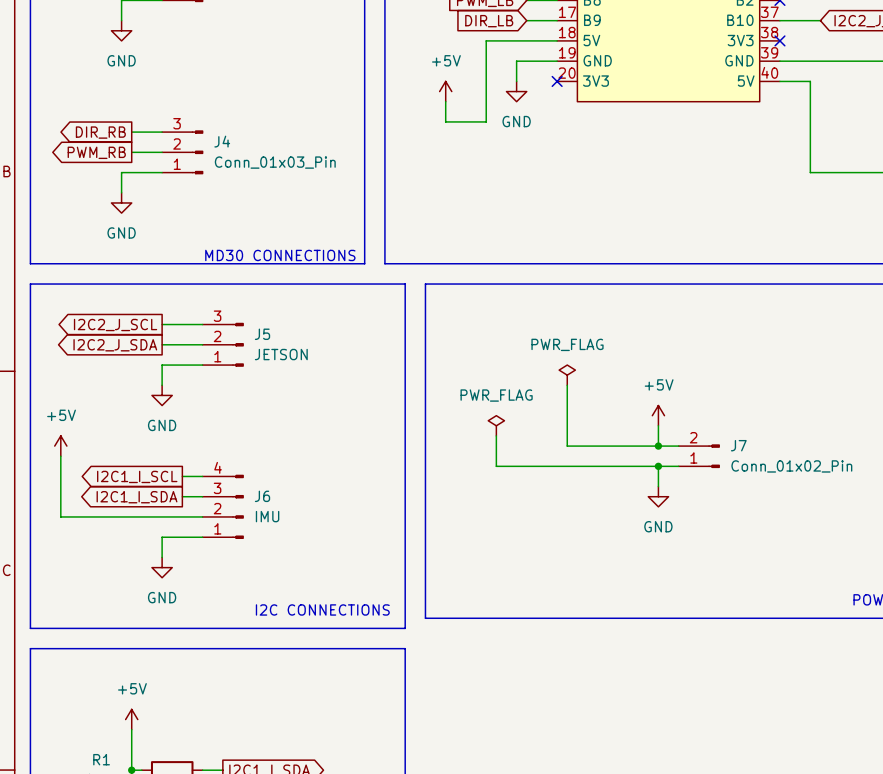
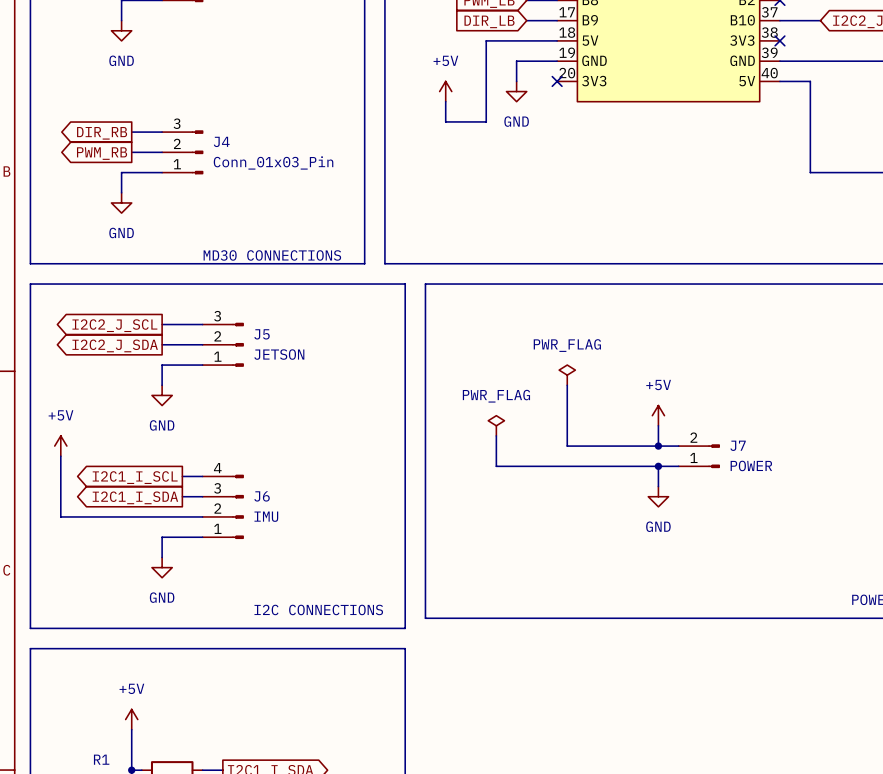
J7 value: Conn_01x02_Pin (791, 466) -> POWER (751, 465)

